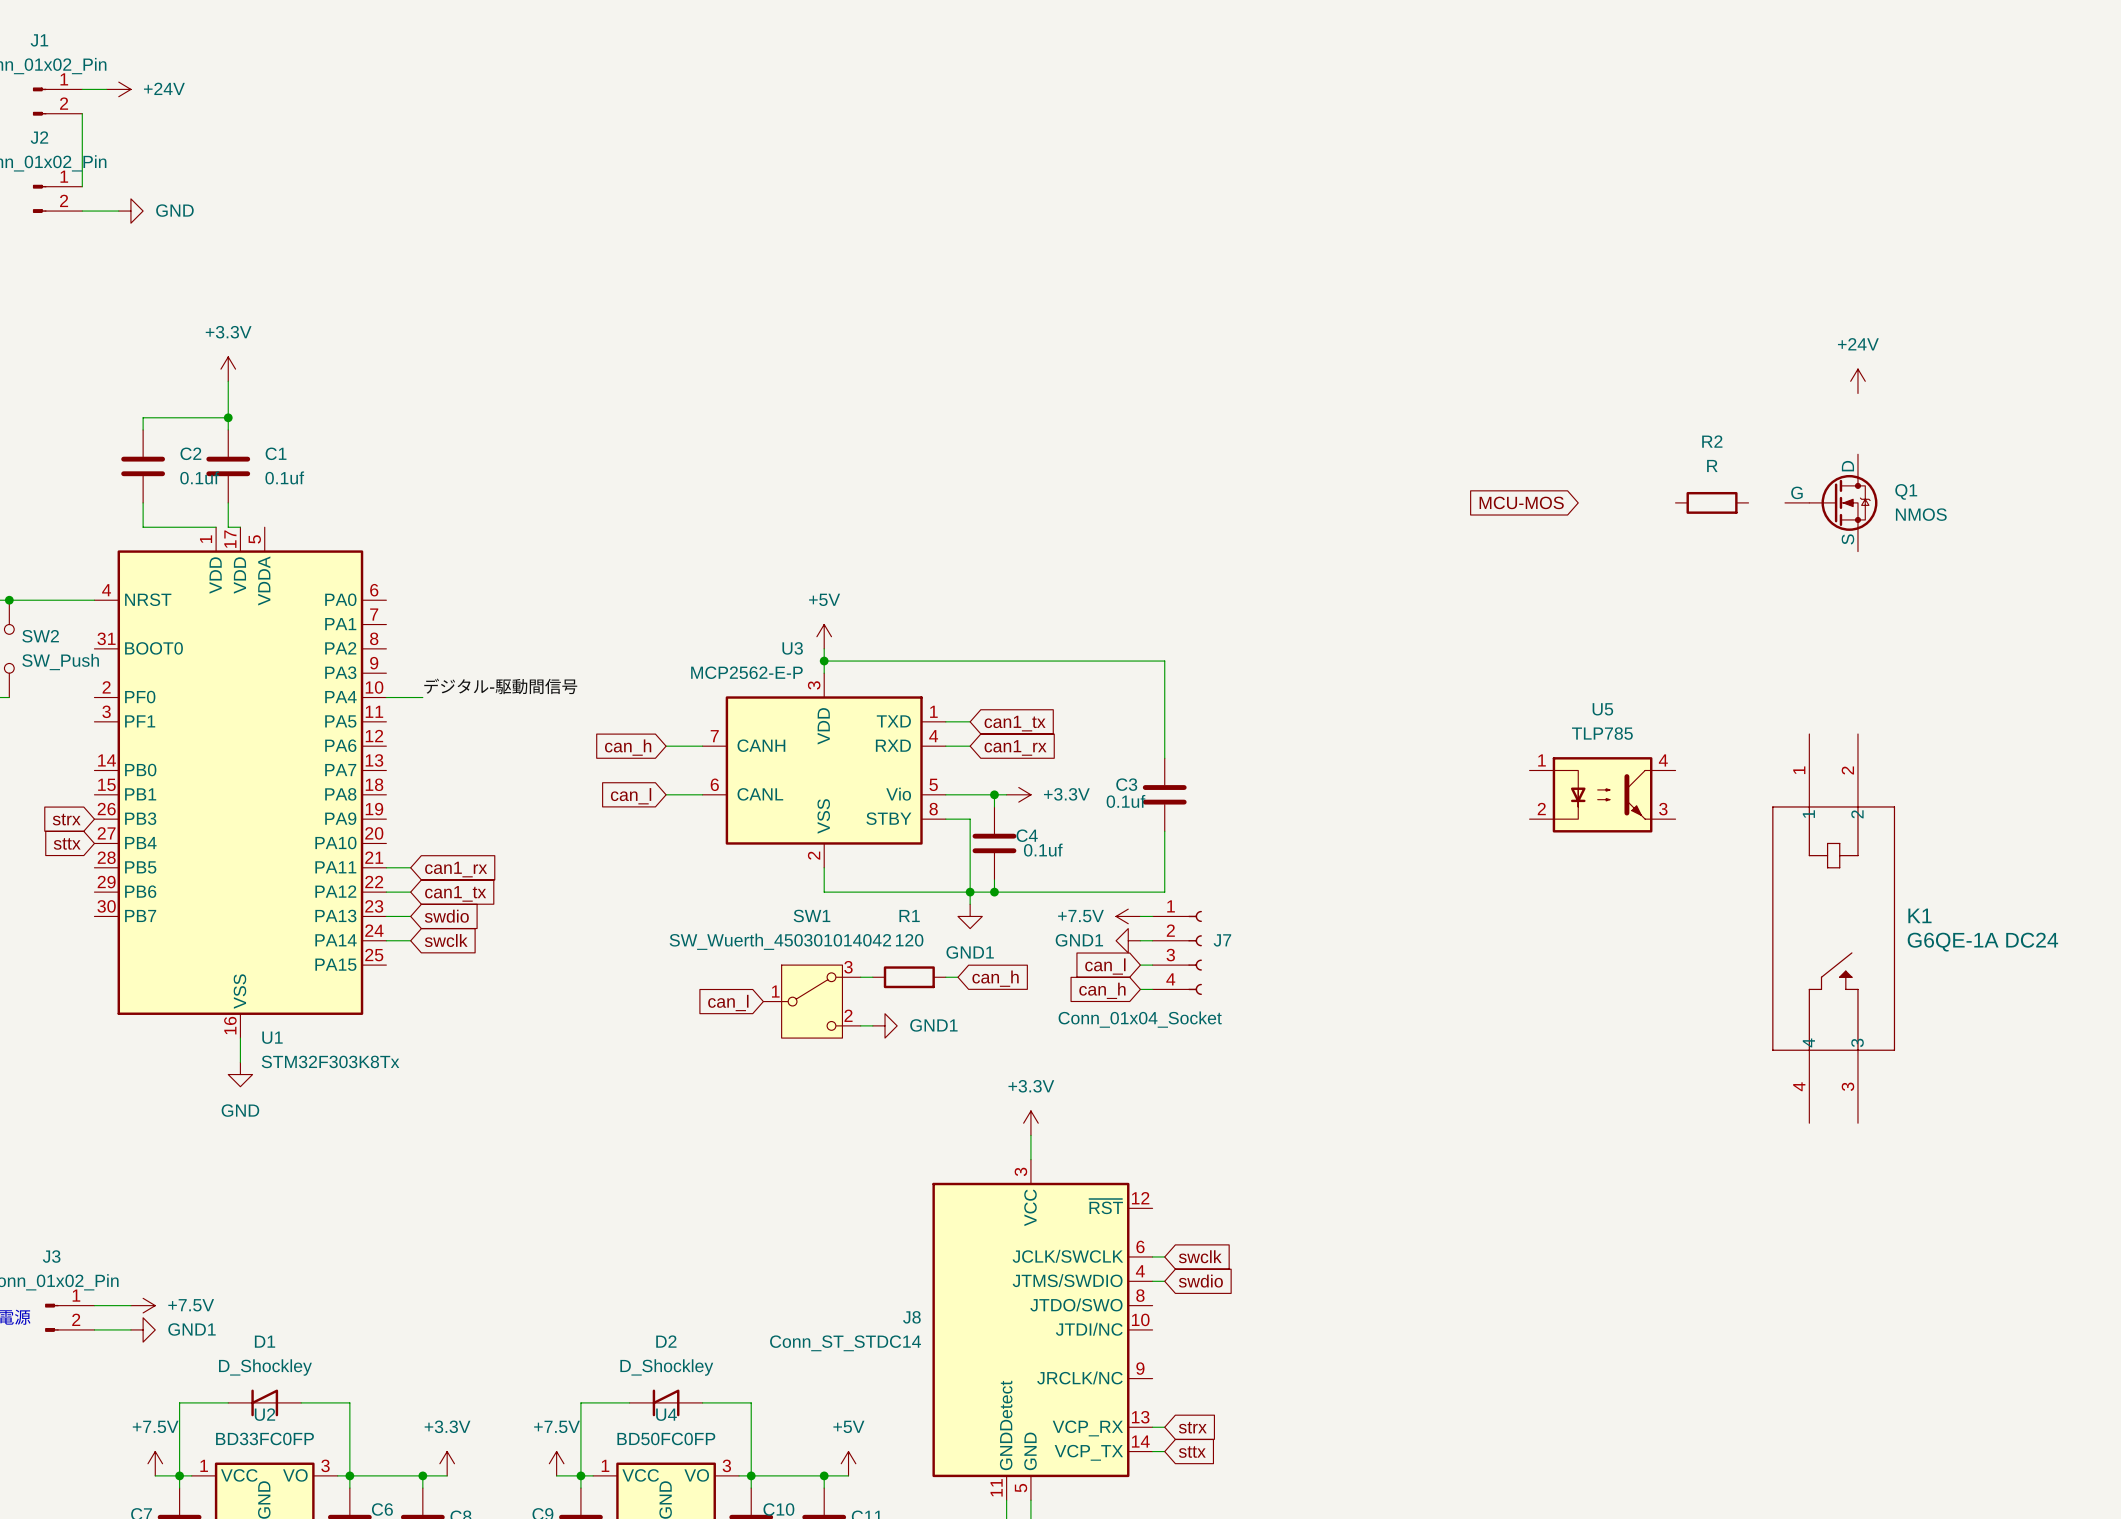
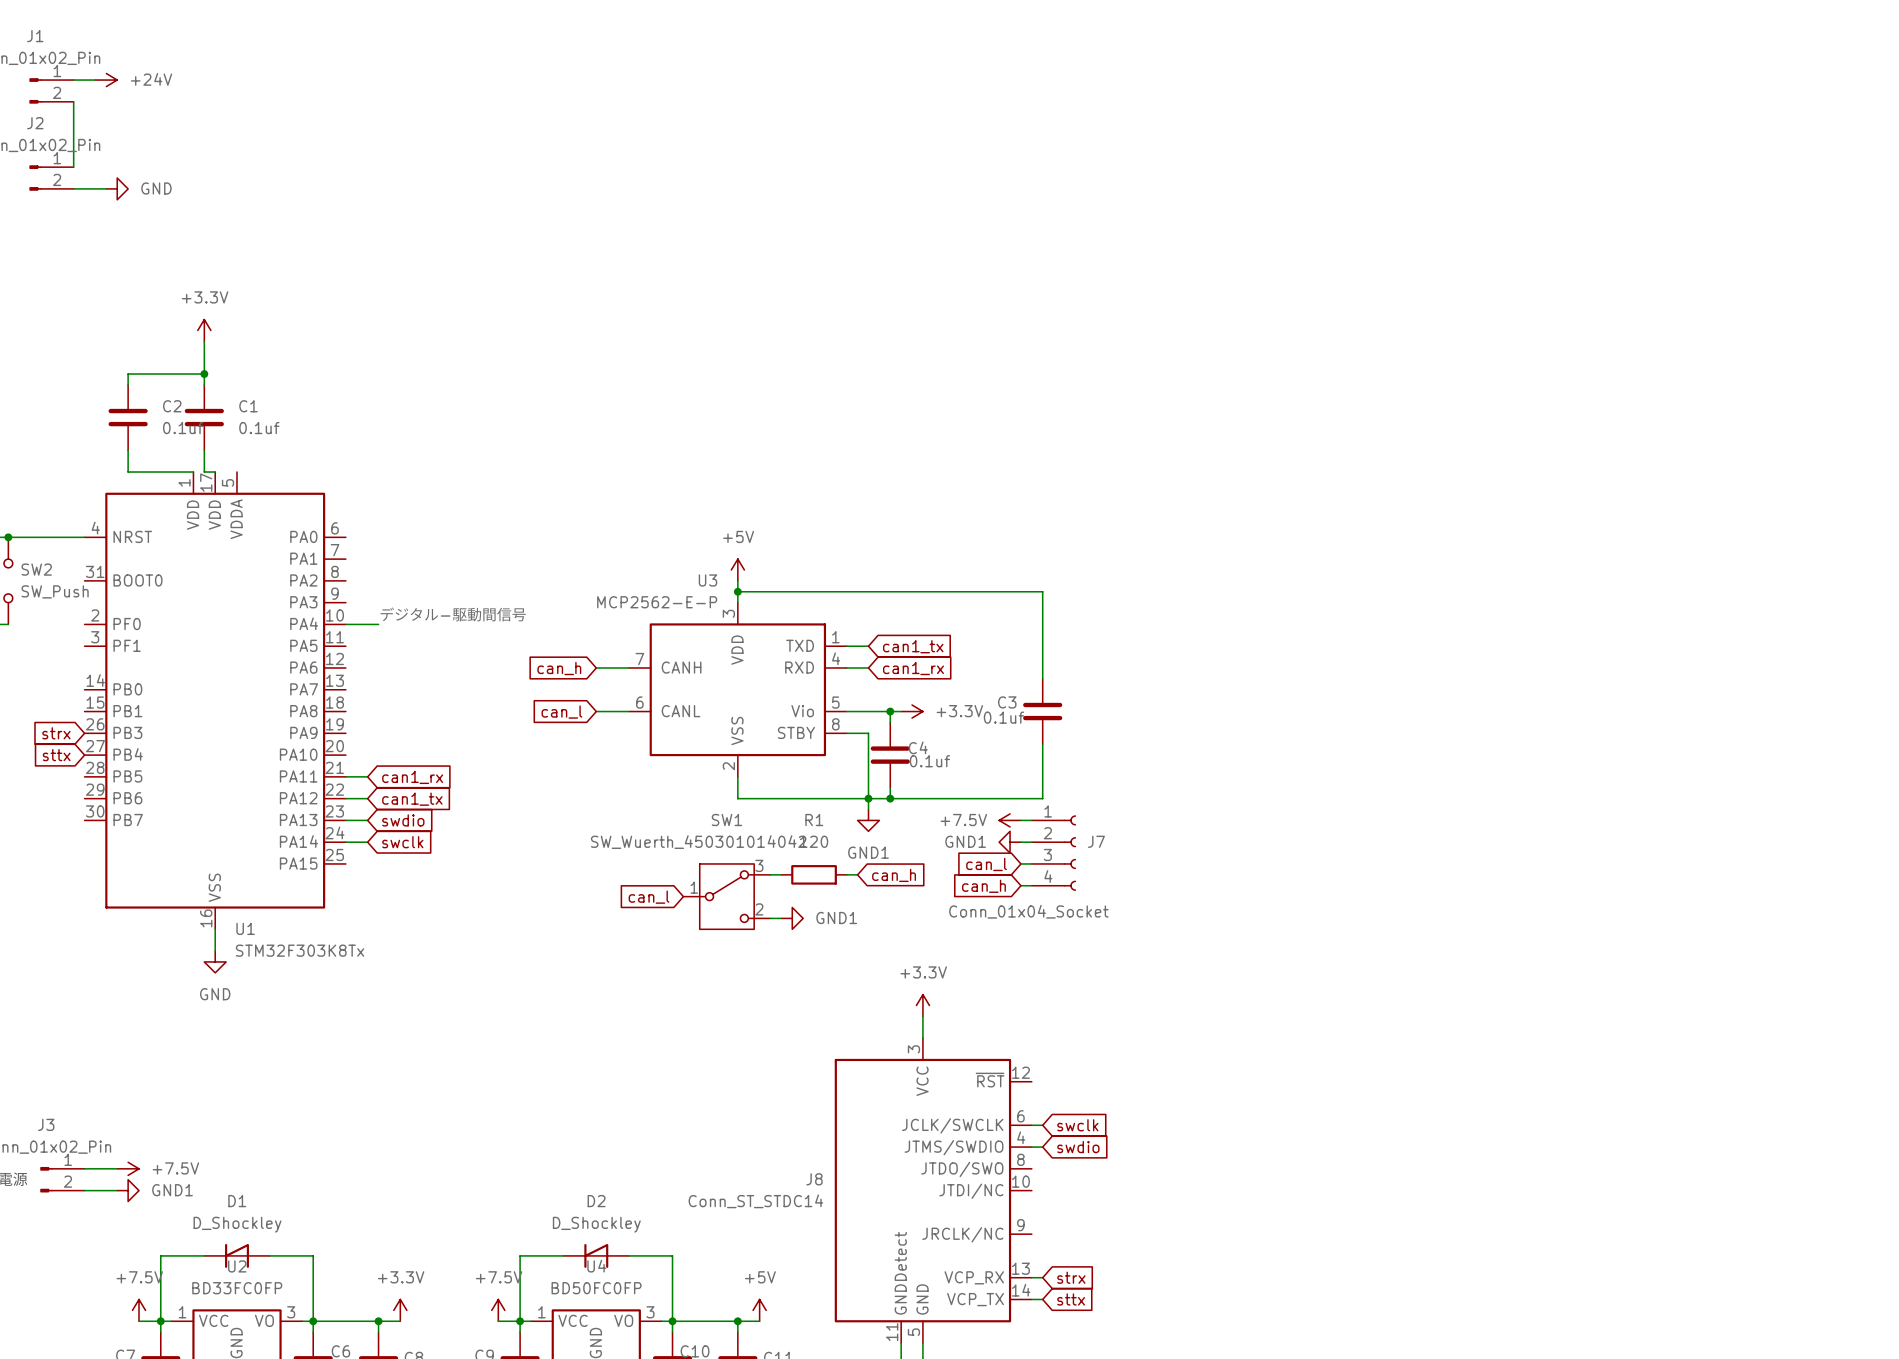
power symbol: +24V (1857, 381) -> none
global label: MCU-MOS (1521, 502) -> none
R2: R (1712, 502) -> none
Q1: NMOS (1831, 502) -> none
U5: TLP785 (1602, 794) -> none
K1: G6QE-1A DC24 (1833, 928) -> none

